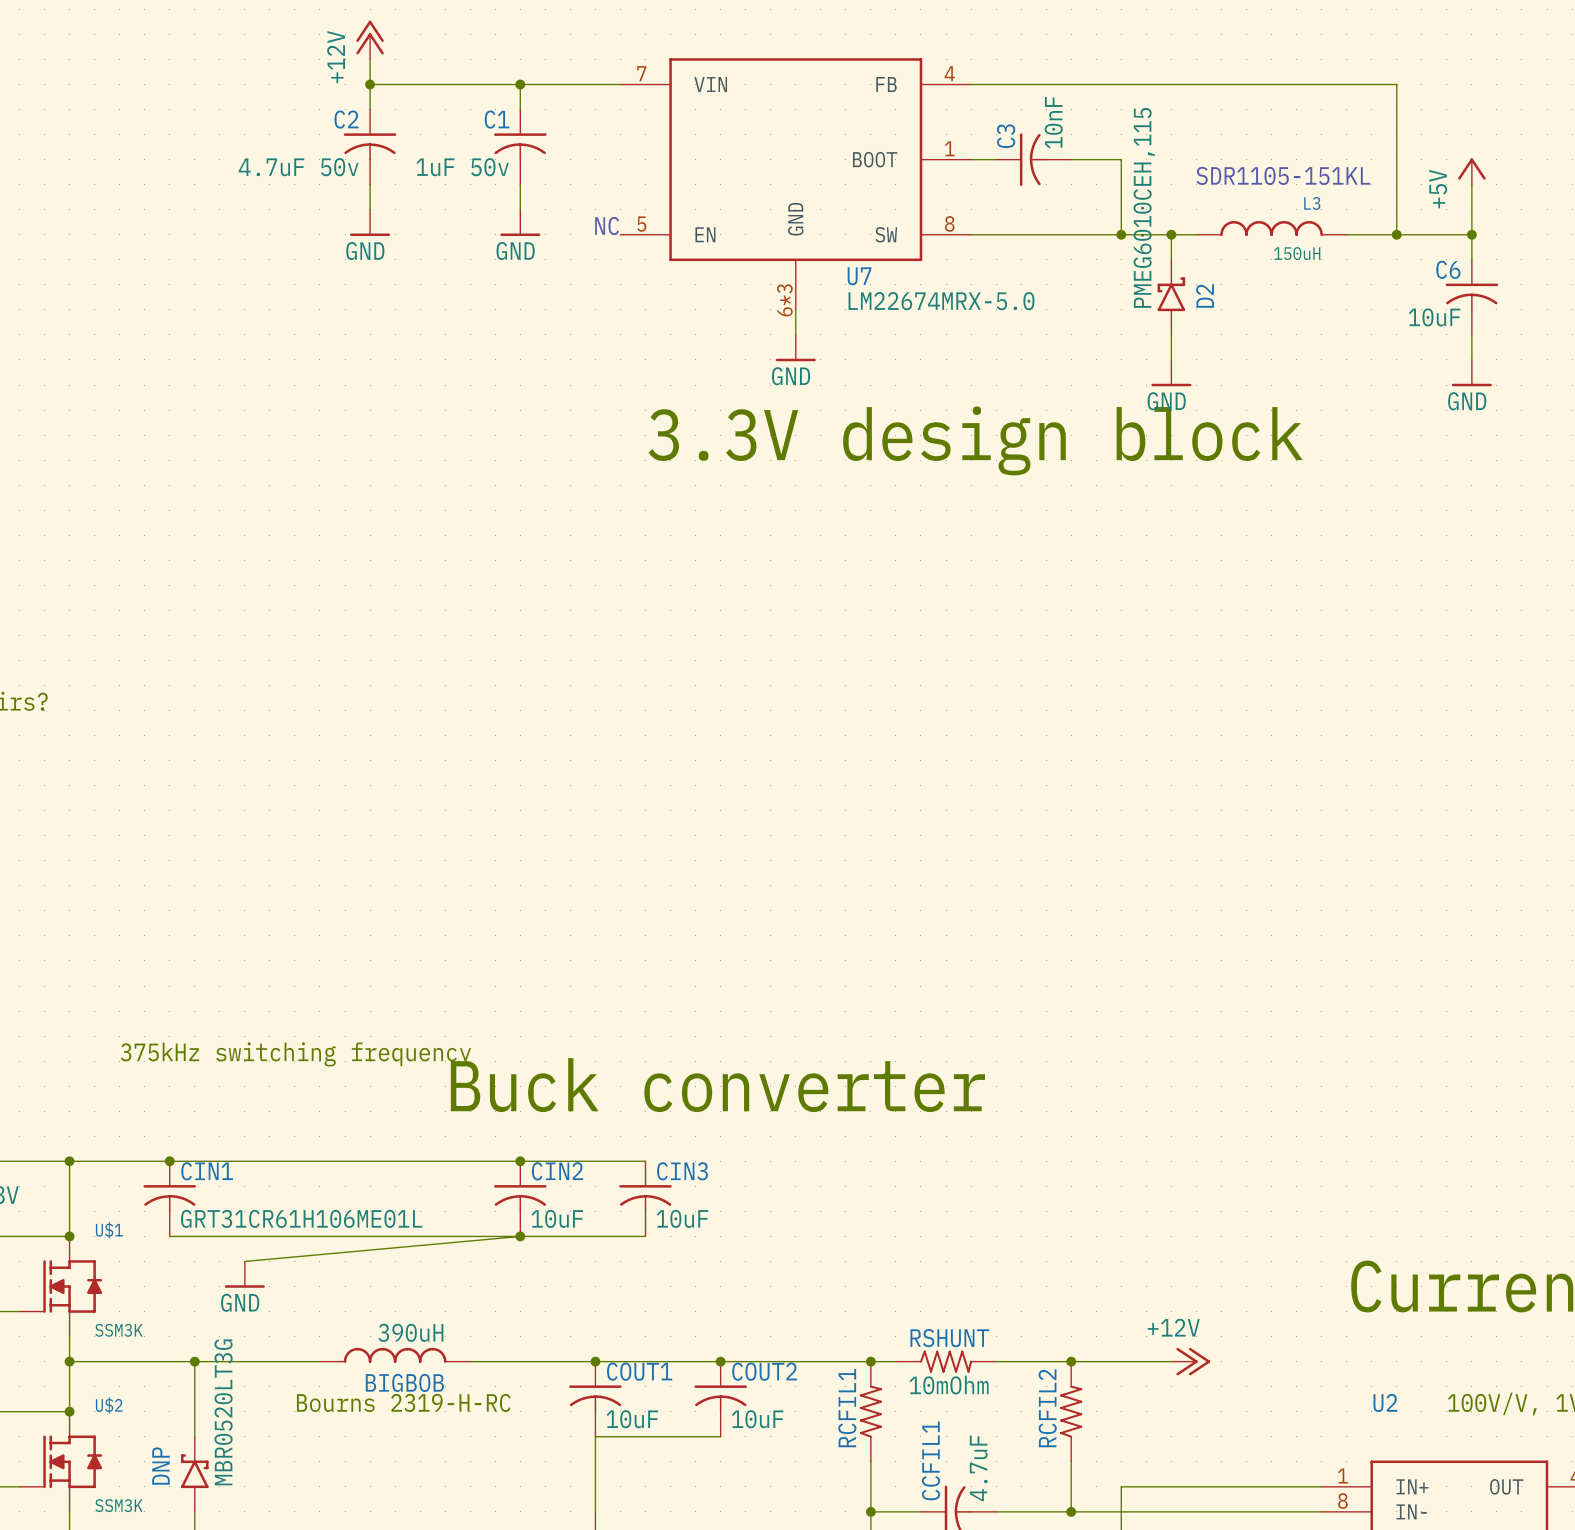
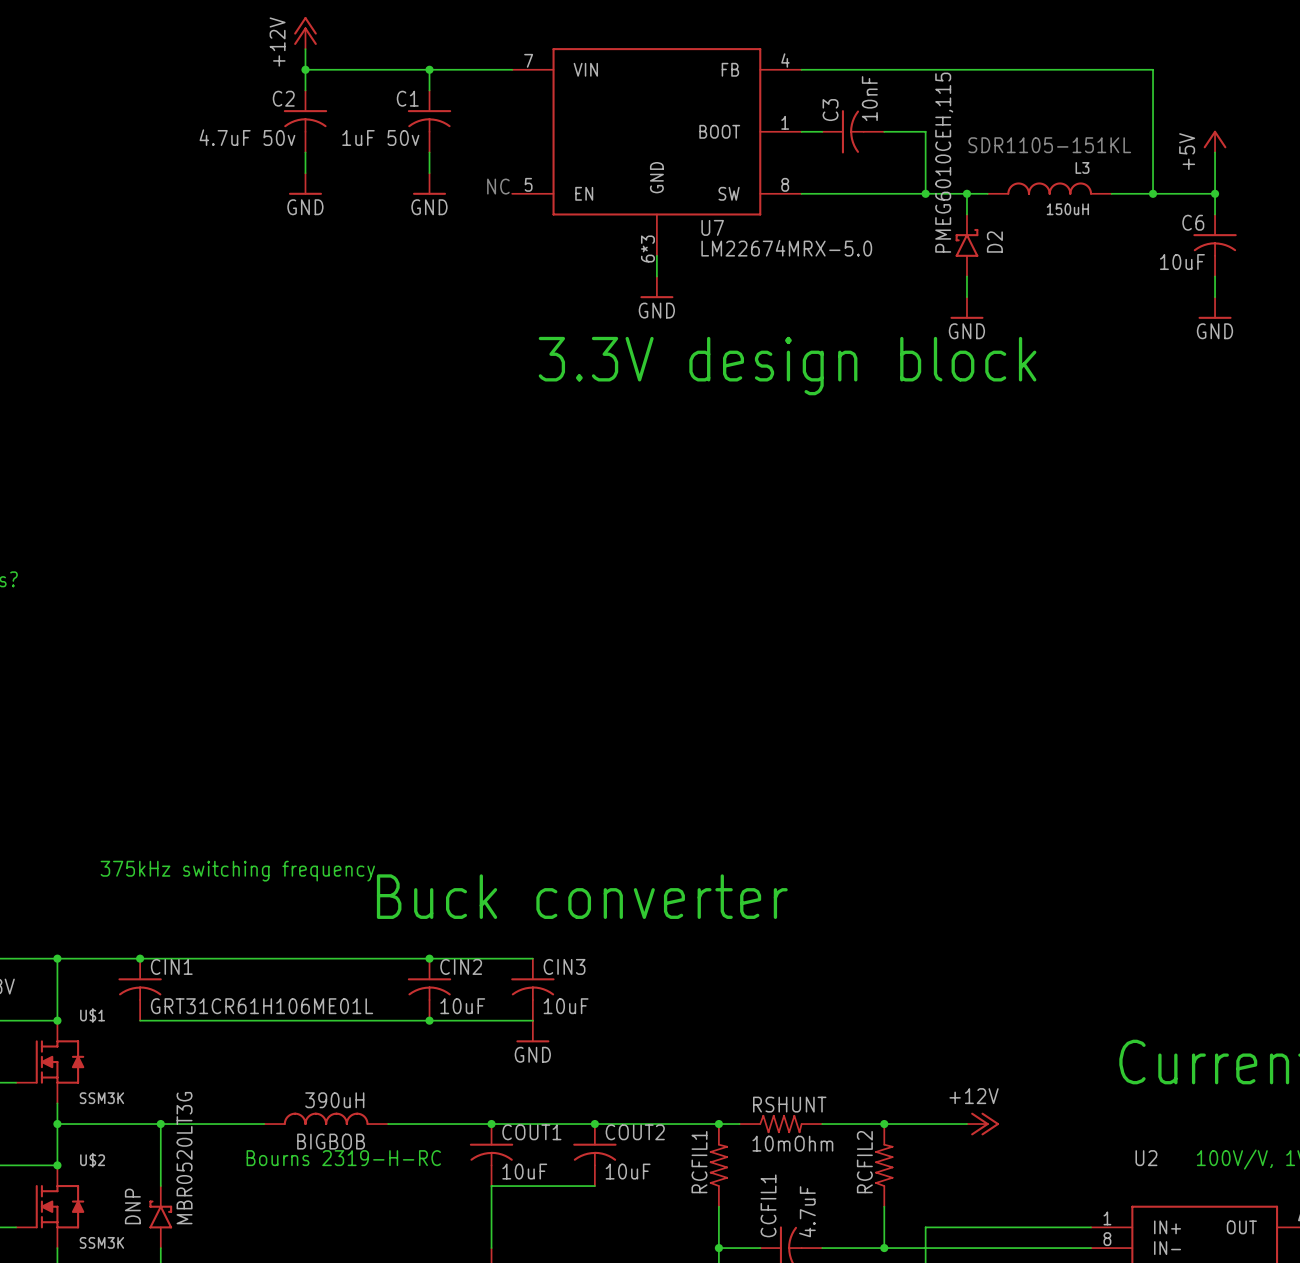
wire: (520, 1236) (244, 1261) -> none
power symbol: none -> GND (532, 1031)
power symbol: GND (244, 1274) -> none

